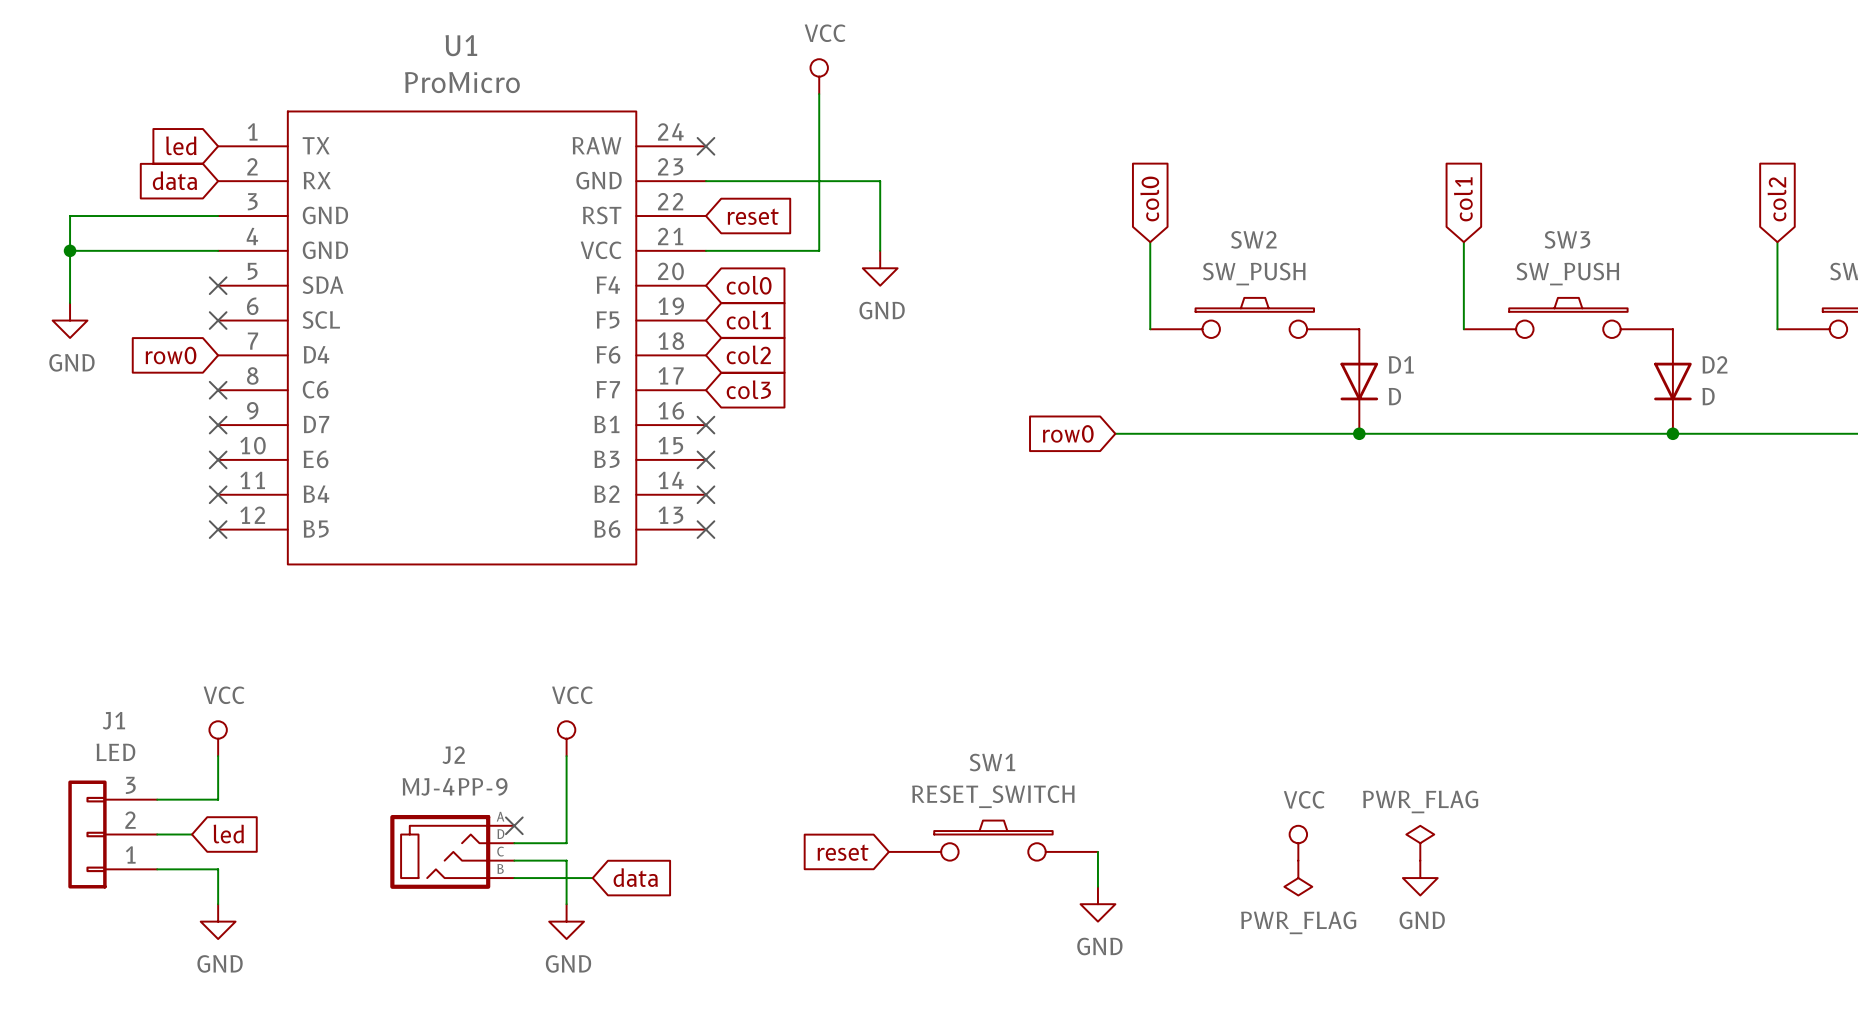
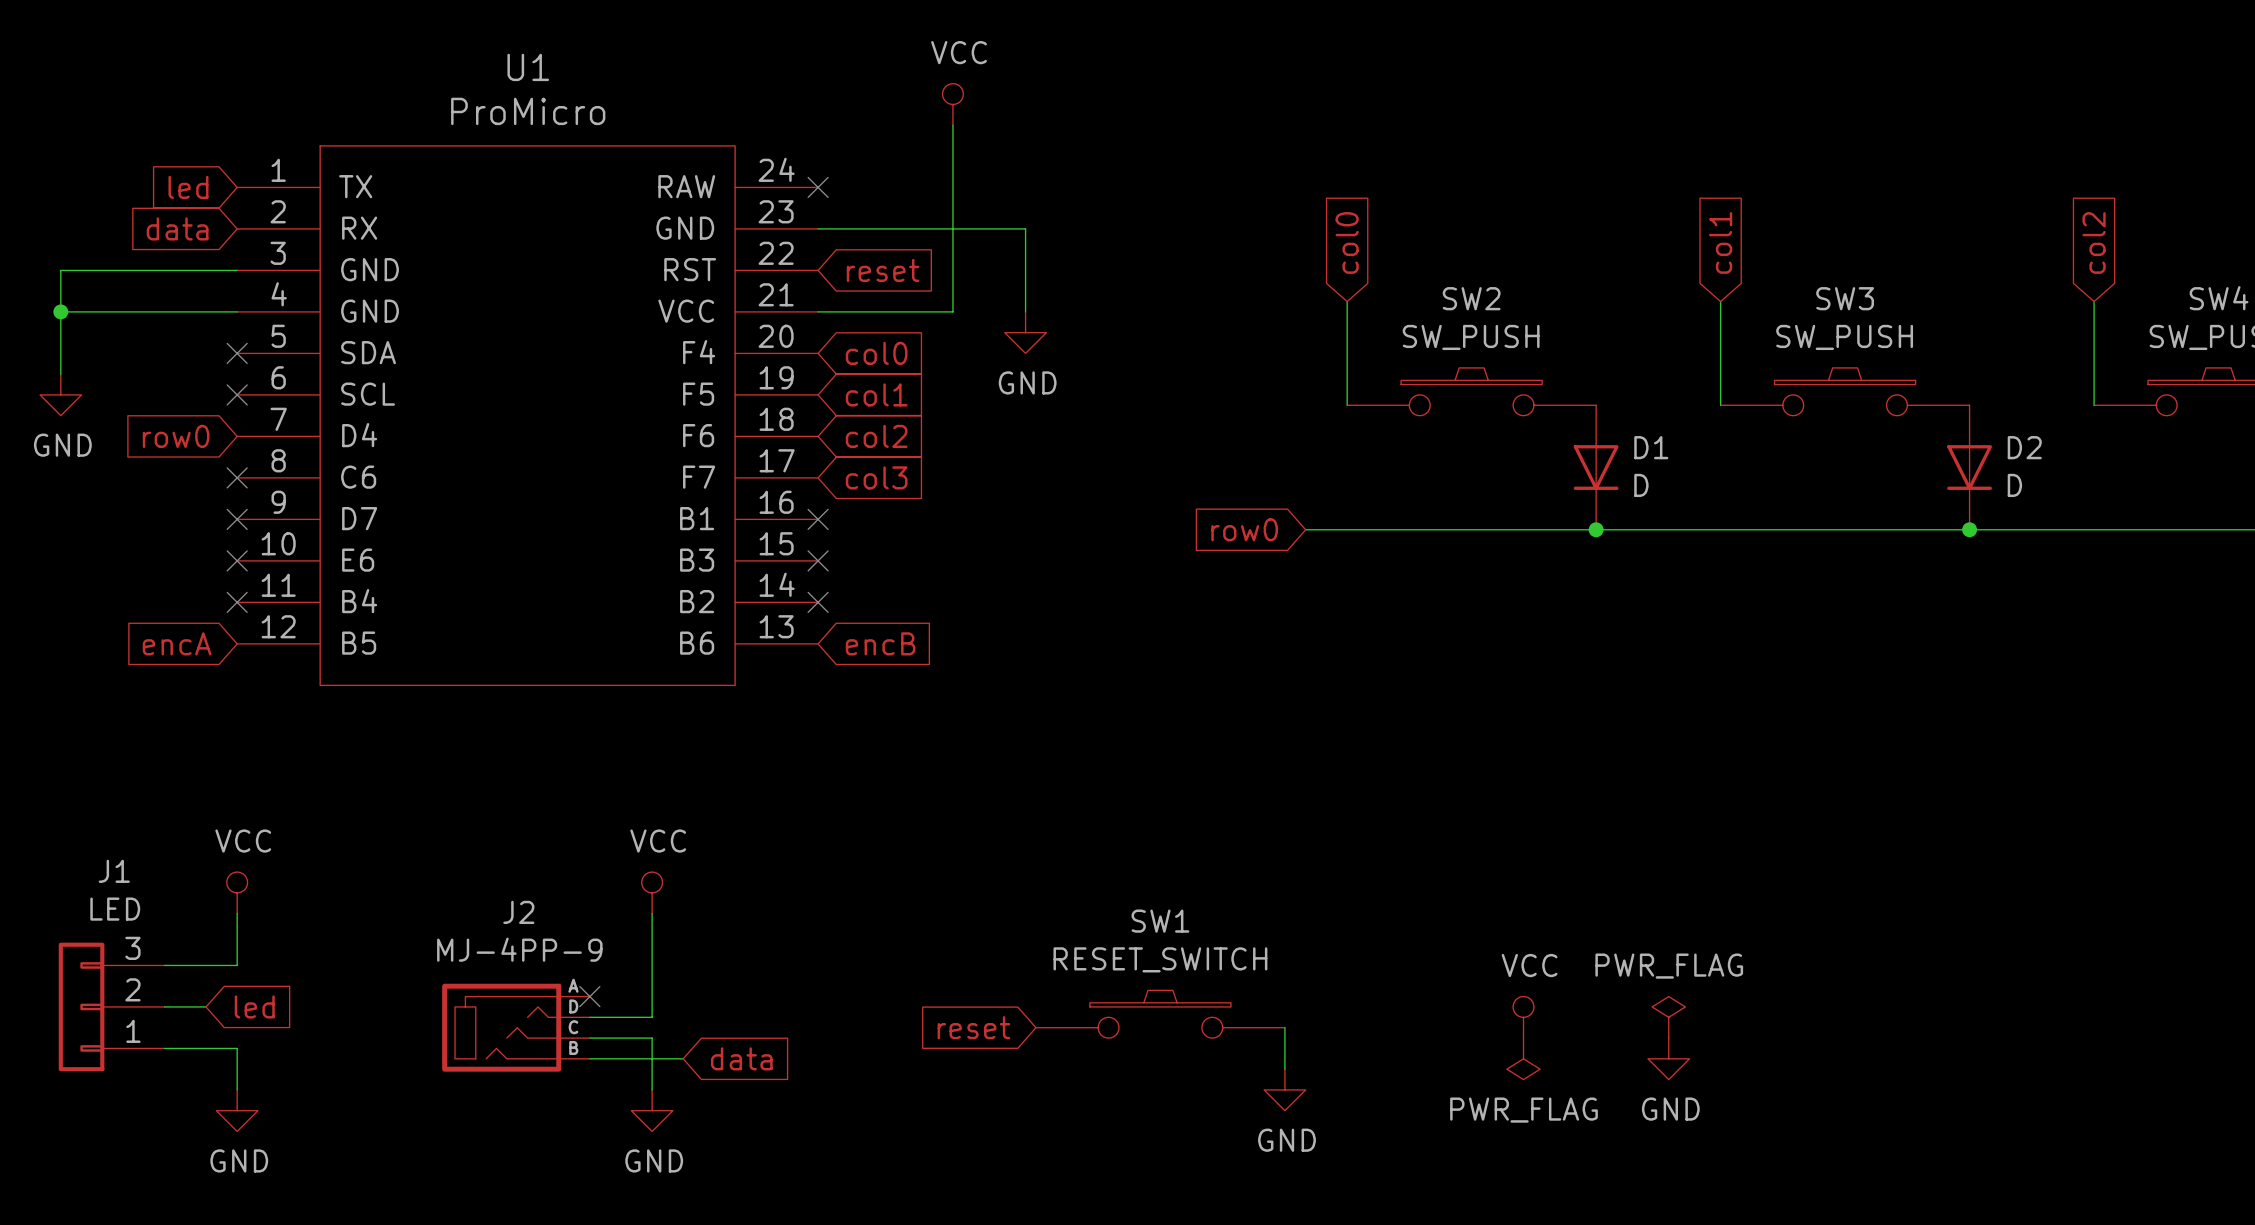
global label: none -> encA (177, 643)
no-connect mark: (218, 529) -> none
no-connect mark: (705, 529) -> none
global label: none -> encB (880, 643)

